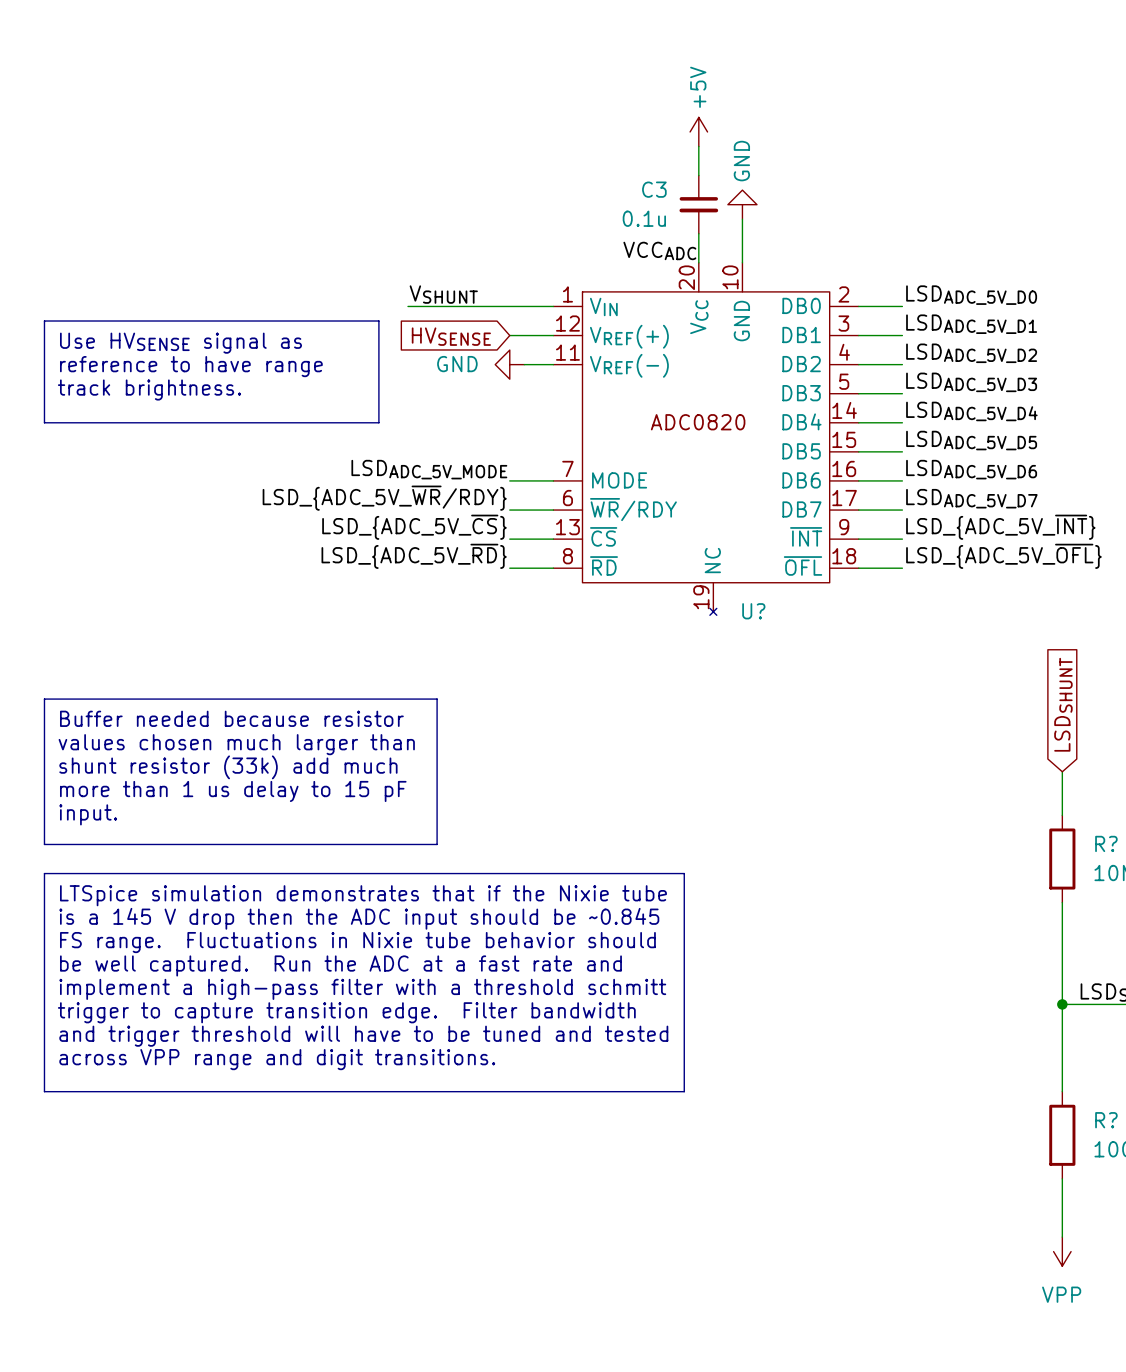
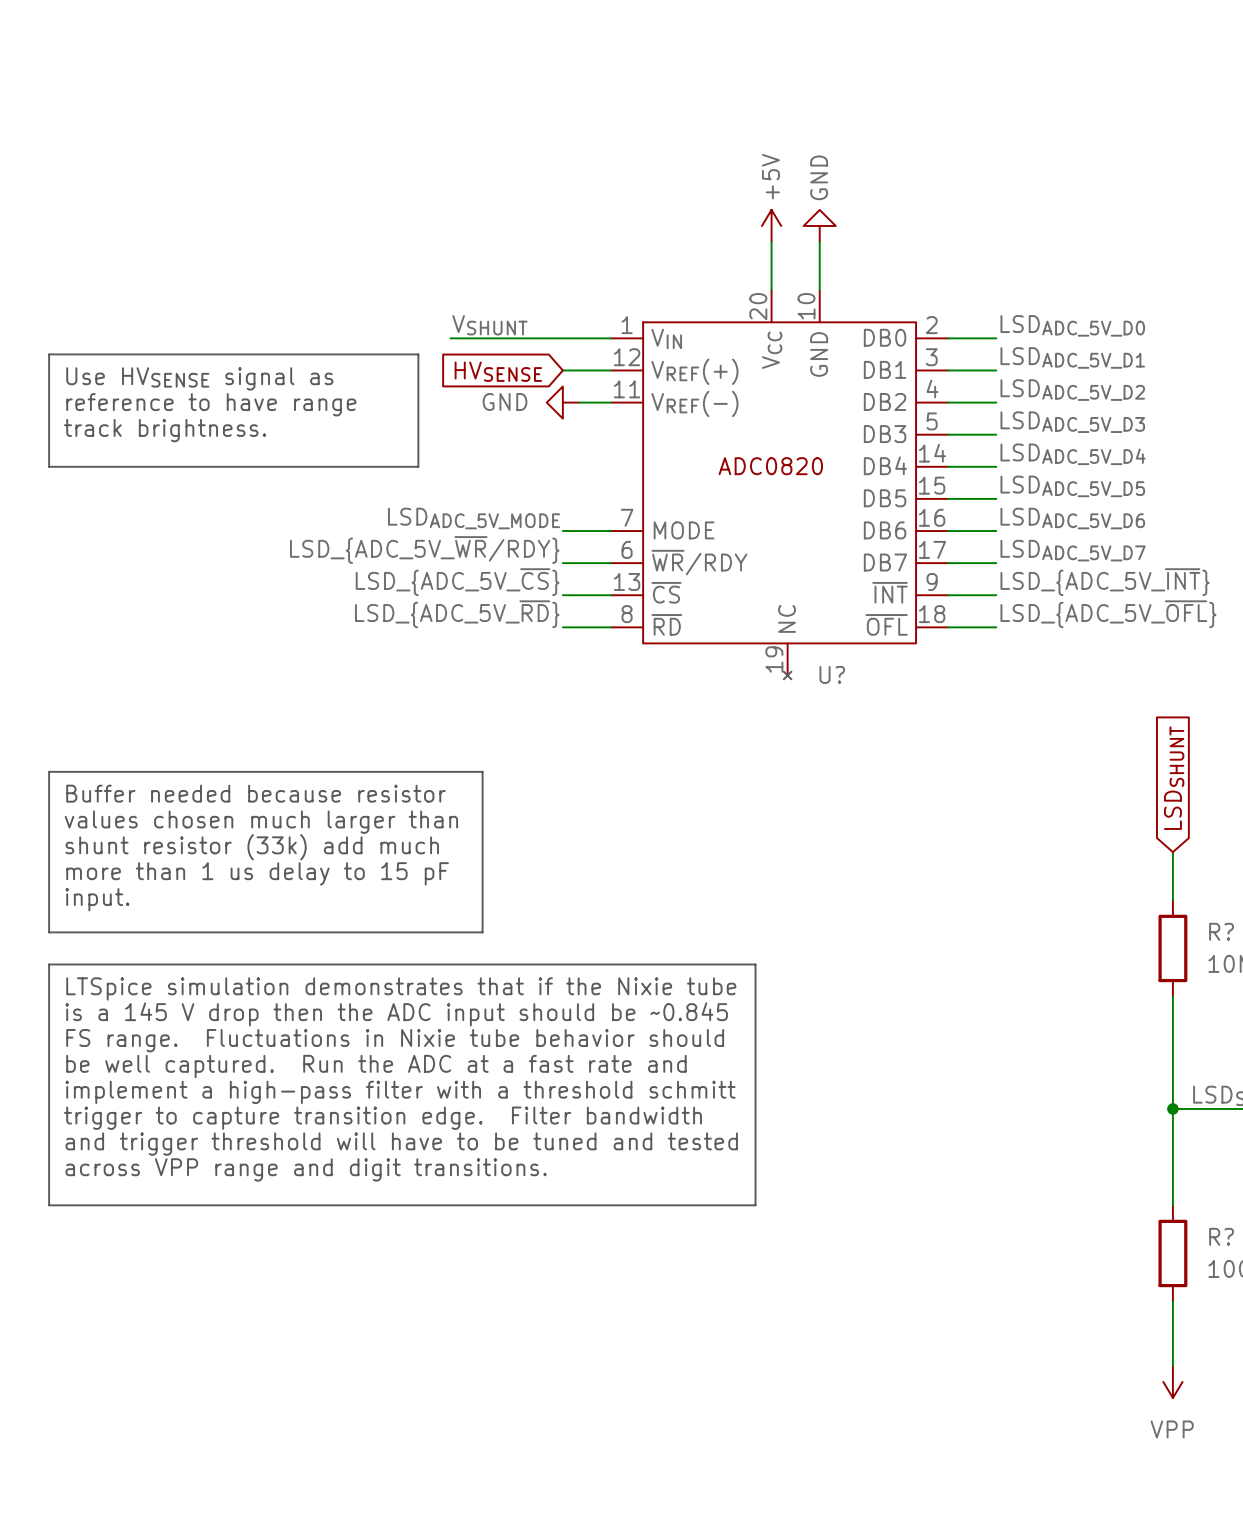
power symbol position: +5V (698, 131) -> +5V (771, 225)
wire: (698, 146) (698, 175) -> none
C3: 0.1u (698, 204) -> none
label: VCCADC (659, 250) -> none

